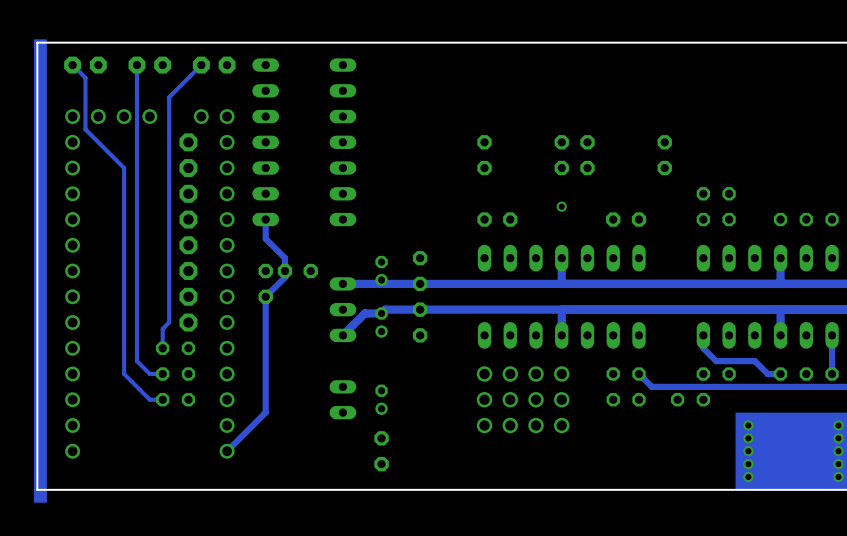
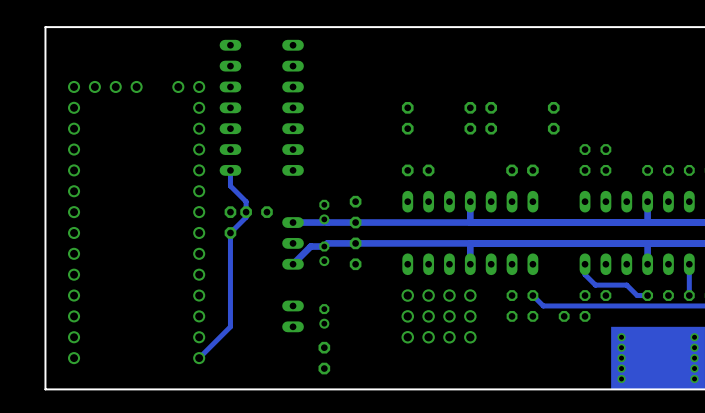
drawing: [34, 39, 47, 503] -> none
track: (72, 65) (85, 77) (85, 129) (124, 168) (124, 374) (149, 399) (162, 399) -> none
part: (85, 65) -> none
track: (136, 65) (136, 361) (149, 374) (162, 374) -> none
part: (149, 65) -> none
track: (201, 65) (169, 97) (169, 322) (162, 328) (162, 348) -> none
part: (214, 65) -> none
via: (561, 206) -> none
part: (188, 232) -> none
part: (175, 348) -> none
part: (175, 374) -> none
part: (175, 399) -> none

